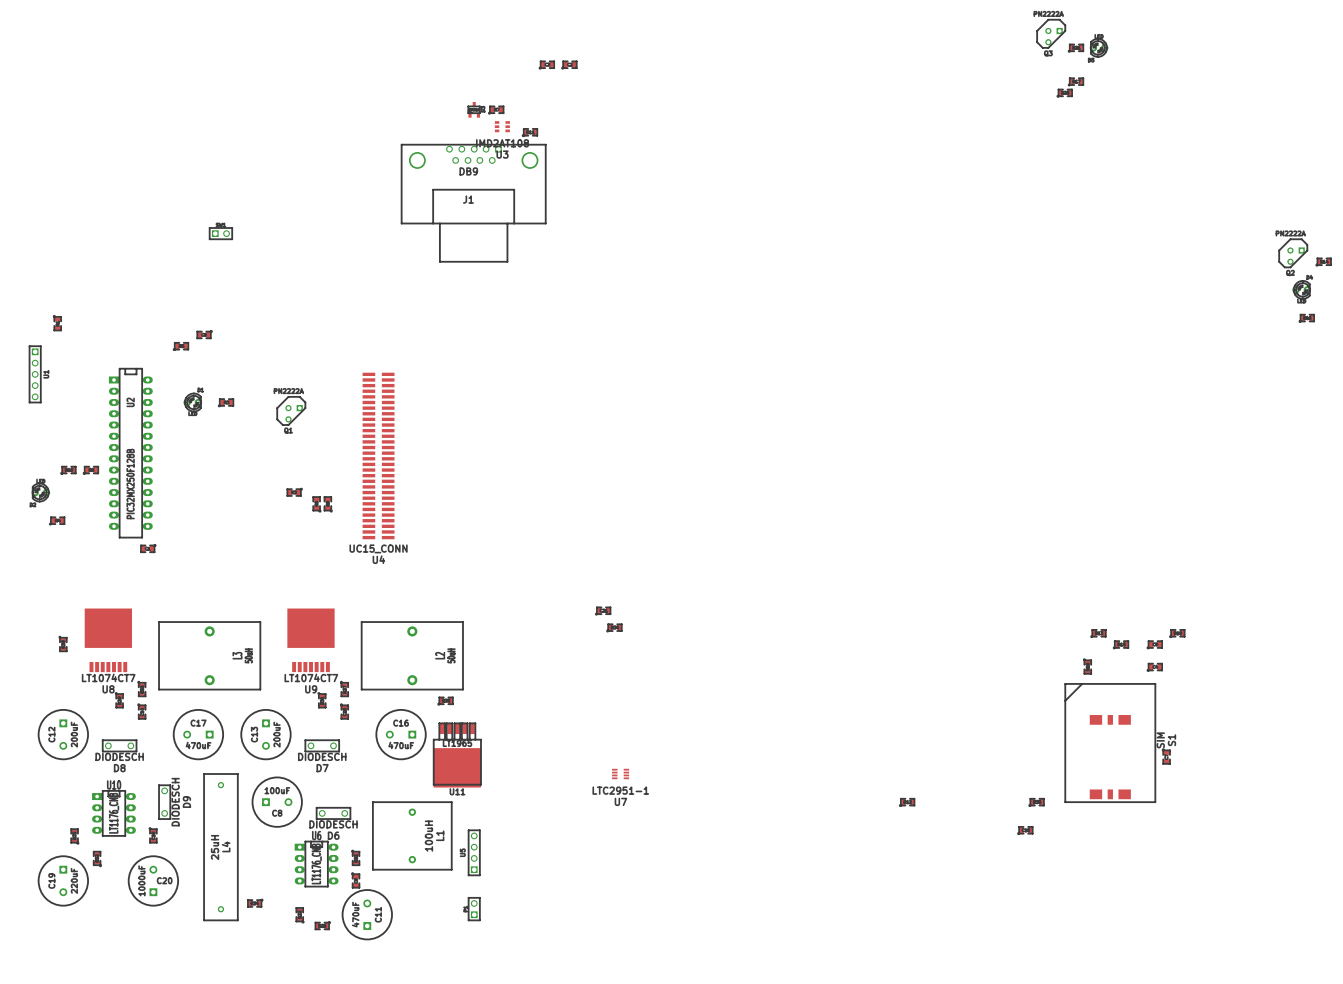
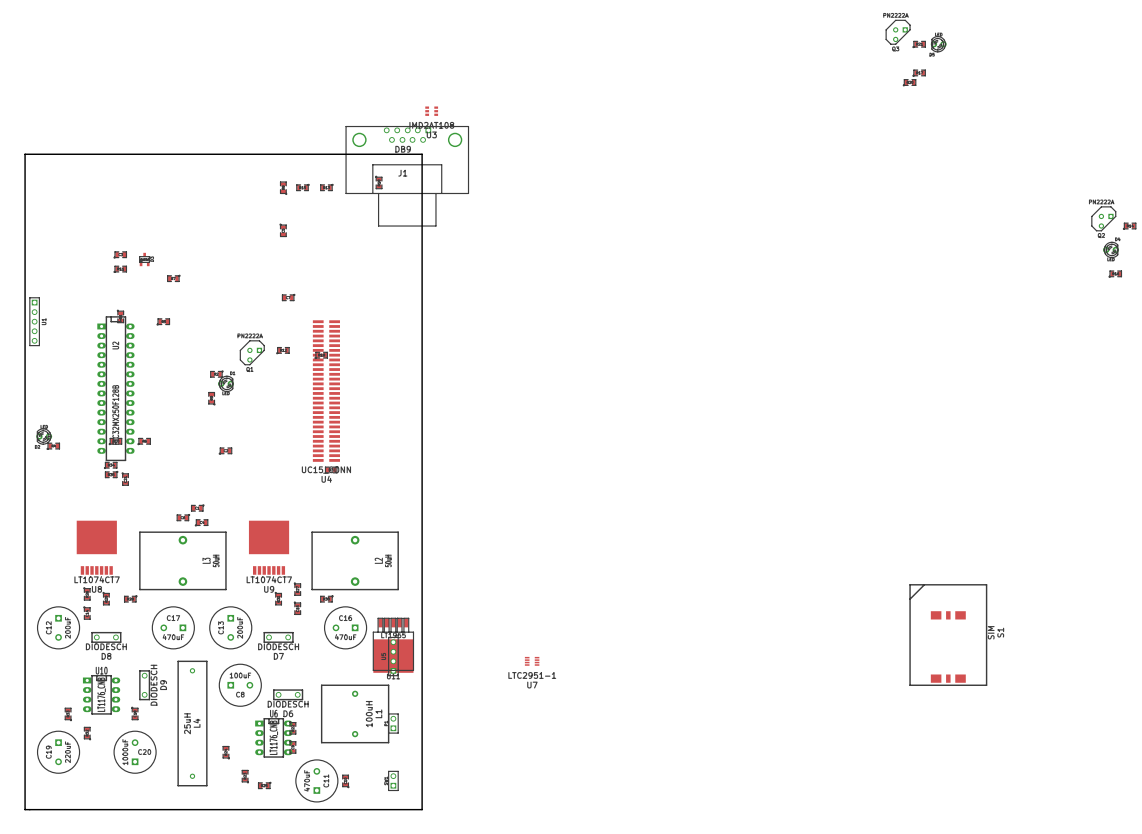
part position: (546, 65) -> (120, 254)
part position: (569, 65) -> (225, 451)
part position: (474, 109) -> (144, 259)
part rotation: 0° (496, 110) -> 180° (173, 278)
part position: (496, 110) -> (173, 278)
part position: (529, 132) -> (120, 269)
board edge: none -> (25, 154) (25, 809) (422, 809) (422, 154) (25, 154)
part rotation: 0° (220, 233) -> 90° counterclockwise (393, 780)
part position: (220, 233) -> (393, 780)
part position: (57, 323) -> (120, 316)
part position: (204, 334) -> (183, 517)
part position: (180, 346) -> (163, 321)
part position: (192, 402) -> (225, 383)
part rotation: 0° (226, 402) -> 180° (216, 374)
part position: (226, 402) -> (216, 374)
part position: (68, 470) -> (115, 441)
part position: (90, 470) -> (144, 441)
part position: (40, 492) -> (44, 436)
part position: (294, 492) -> (331, 469)
part position: (316, 504) -> (283, 188)
part position: (328, 504) -> (211, 398)
part position: (148, 548) -> (197, 508)
part rotation: 0° (603, 611) -> 90° clockwise (125, 479)
part position: (603, 611) -> (125, 479)
part position: (614, 627) -> (110, 465)
part rotation: 0° (1098, 633) -> 180° (326, 187)
part position: (1098, 633) -> (326, 187)
part position: (1177, 633) -> (321, 355)
part rotation: 0° (63, 643) -> 90° clockwise (130, 598)
part position: (63, 643) -> (130, 598)
part rotation: 0° (1121, 644) -> 180° (302, 187)
part position: (1121, 644) -> (302, 187)
part rotation: 0° (1154, 644) -> 90° clockwise (283, 230)
part position: (1154, 644) -> (283, 230)
part position: (1087, 666) -> (378, 182)
part position: (1154, 667) -> (201, 522)
part position: (141, 689) -> (87, 593)
part rotation: 0° (445, 701) -> 180° (111, 474)
part position: (445, 701) -> (111, 474)
part position: (141, 711) -> (87, 613)
part rotation: 0° (1166, 756) -> 90° clockwise (288, 297)
part position: (1166, 756) -> (288, 297)
part position: (907, 802) -> (282, 350)
part rotation: 0° (1036, 802) -> 180° (326, 598)
part position: (1036, 802) -> (326, 598)
part rotation: 0° (1025, 830) -> 90° counterclockwise (345, 781)
part position: (1025, 830) -> (345, 781)
part position: (474, 852) -> (393, 656)
part position: (355, 857) -> (292, 727)
part position: (355, 880) -> (292, 746)
part rotation: 0° (255, 903) -> 90° clockwise (226, 752)
part position: (255, 903) -> (226, 752)
part position: (474, 909) -> (393, 723)
part position: (300, 915) -> (245, 776)
part position: (322, 925) -> (264, 785)

